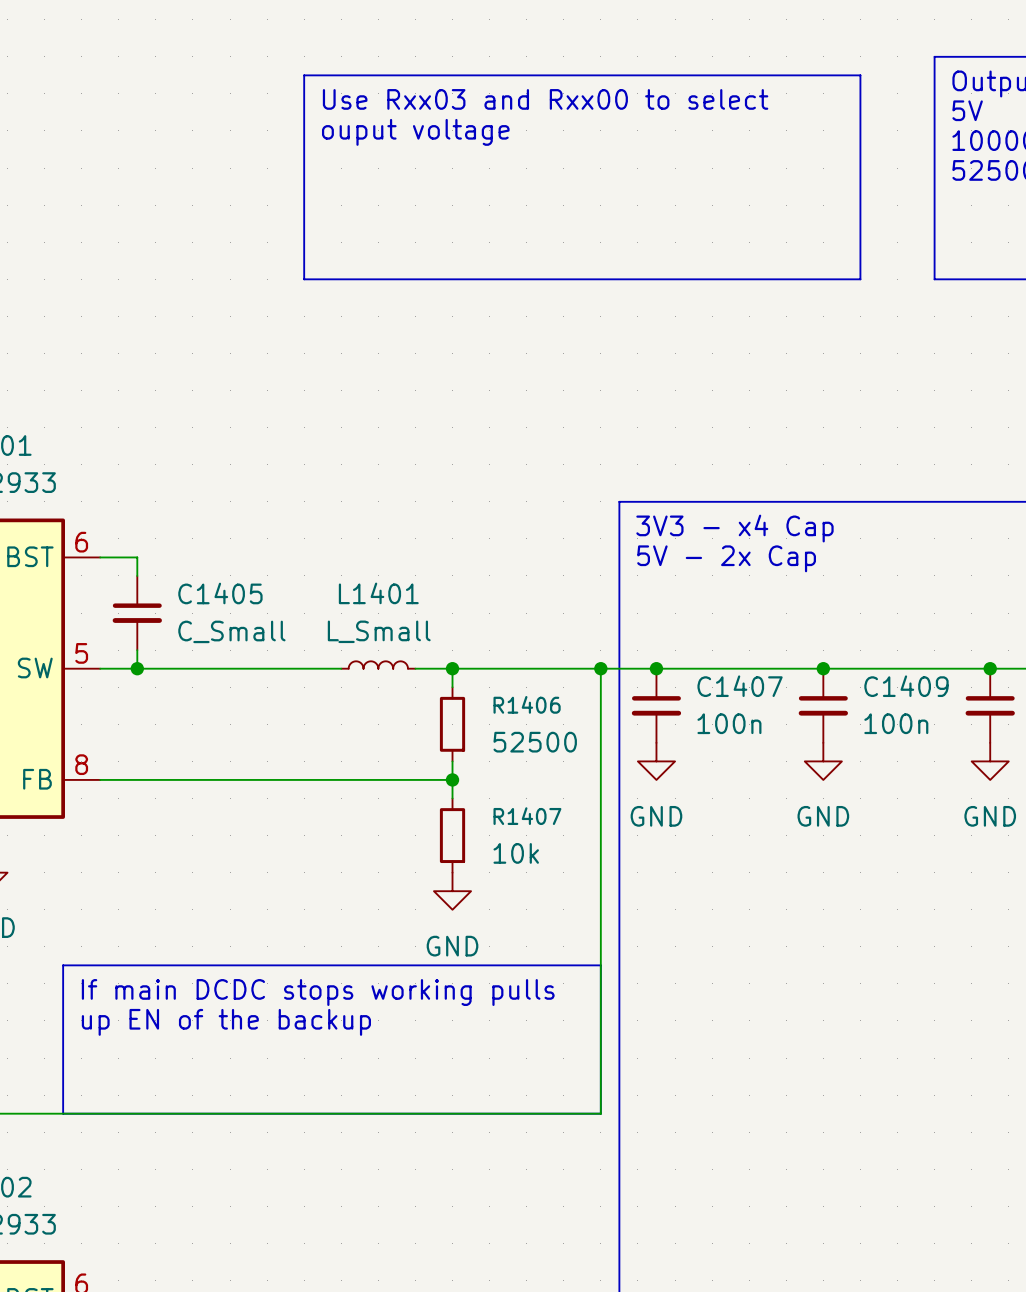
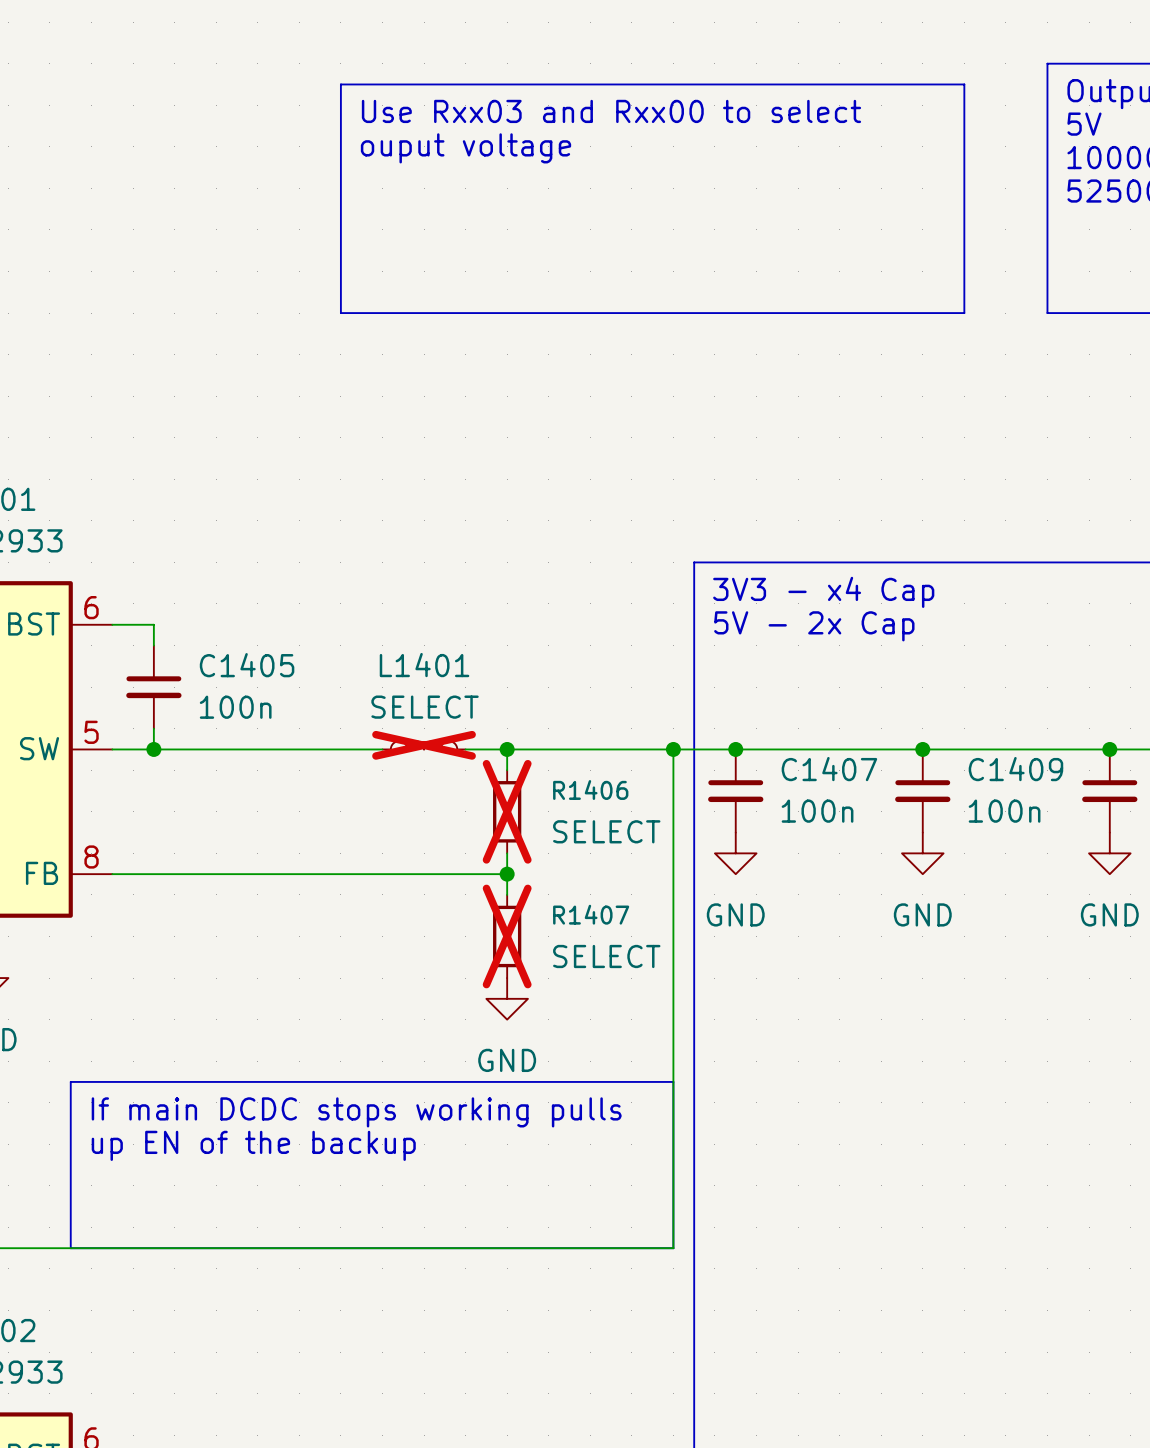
C1405 value: C_Small (231, 631) -> 100n (235, 707)
L1401 value: L_Small (379, 631) -> SELECT (425, 707)
L1401 do-not-place cross: none -> (424, 745)
R1406 do-not-place cross: none -> (507, 811)
R1406 value: 52500 (535, 742) -> SELECT (606, 831)
R1407 do-not-place cross: none -> (507, 936)
R1407 value: 10k (516, 853) -> SELECT (606, 956)

